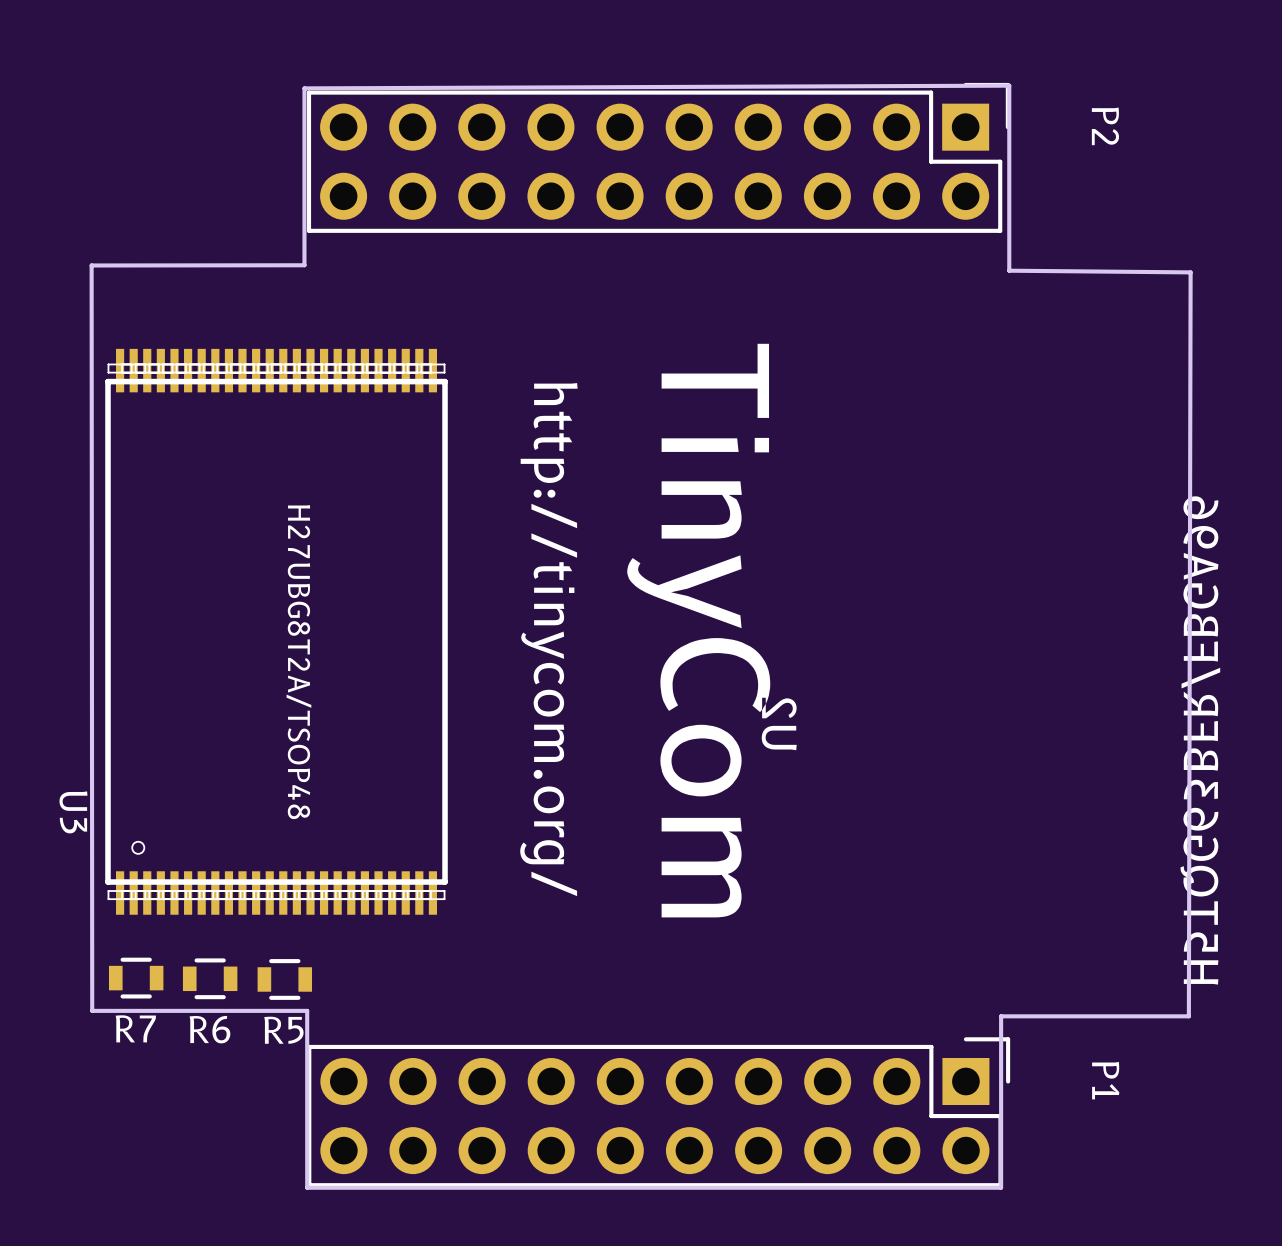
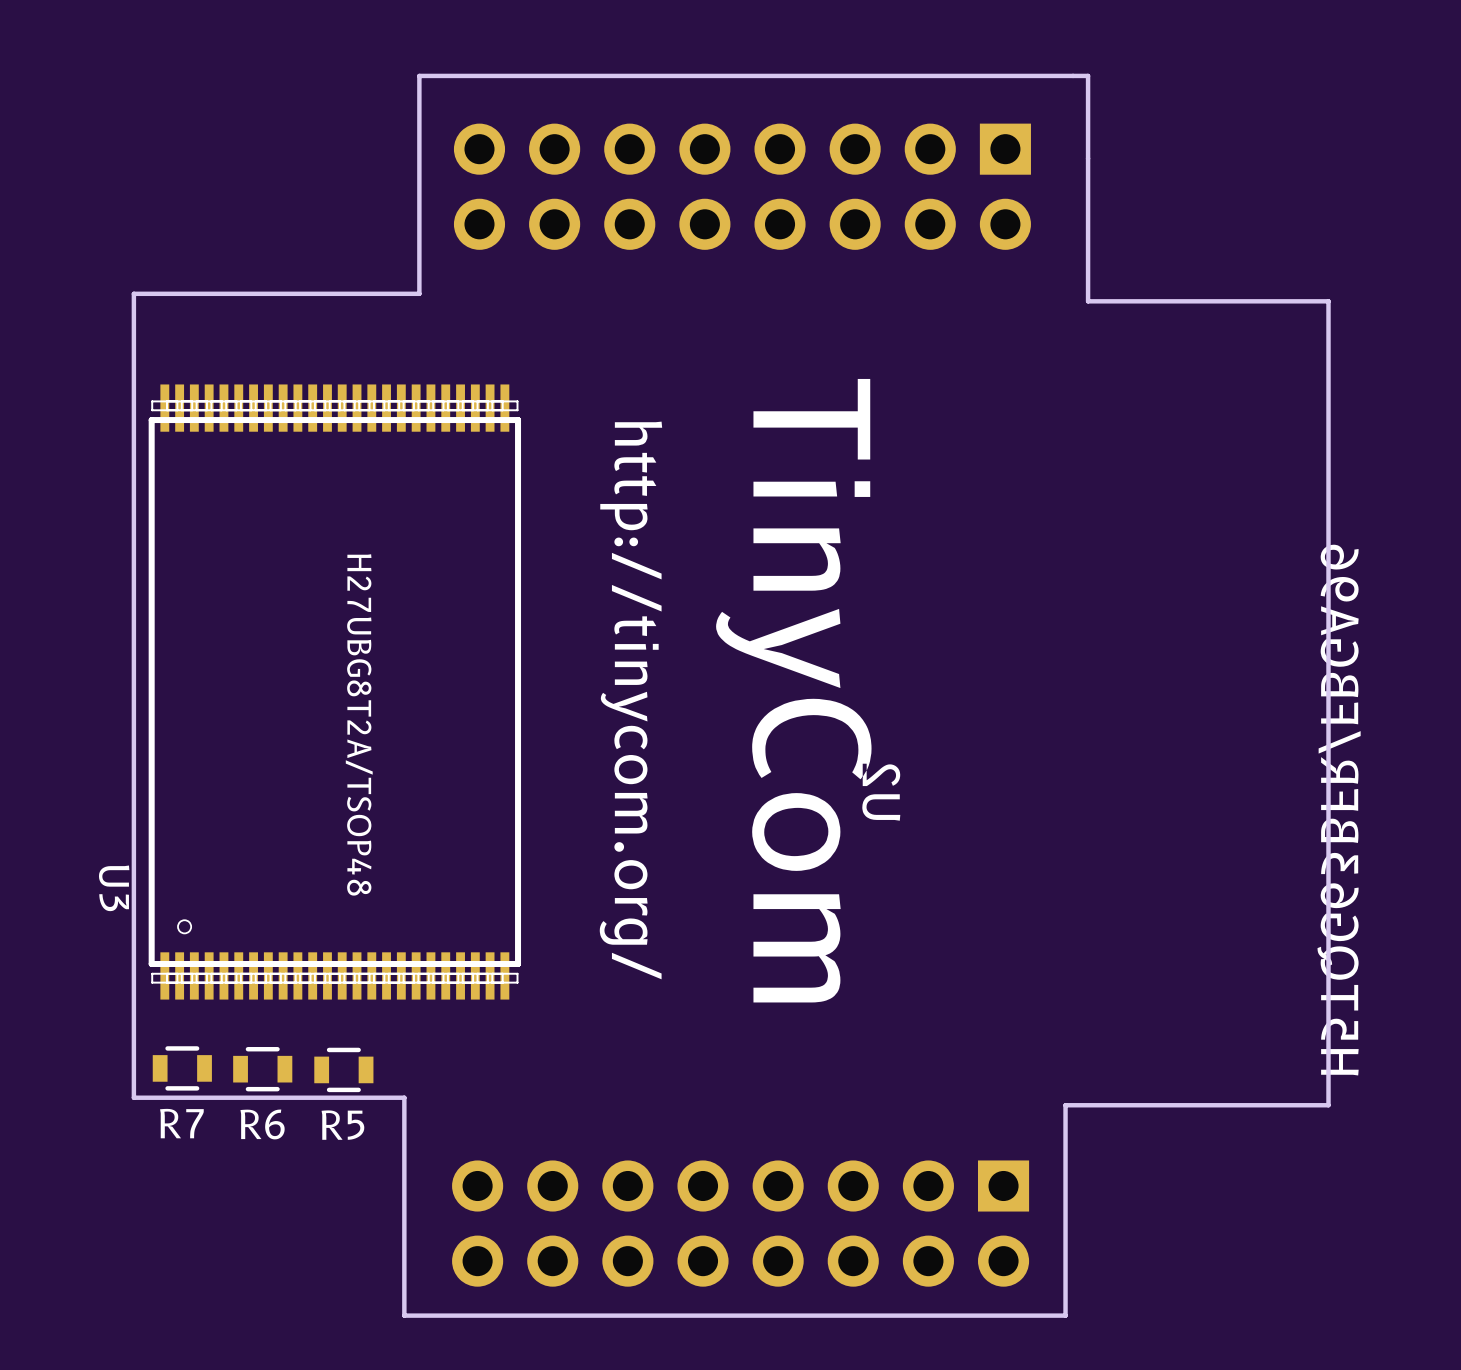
board edge: (1009, 85) (1009, 270) (1190, 272) (1188, 1016) (1001, 1016) (1001, 1187) (307, 1187) (307, 1010) (92, 1010) (91, 265) (304, 265) (304, 88) (1009, 85) -> (1088, 75) (1088, 301) (1328, 301) (1328, 1105) (1065, 1105) (1065, 1315) (404, 1315) (404, 1097) (133, 1097) (133, 293) (419, 293) (419, 75) (1088, 75)
P2: (658, 157) -> none
part: none -> (742, 186)
P1: (658, 1112) -> none
part: none -> (740, 1223)

